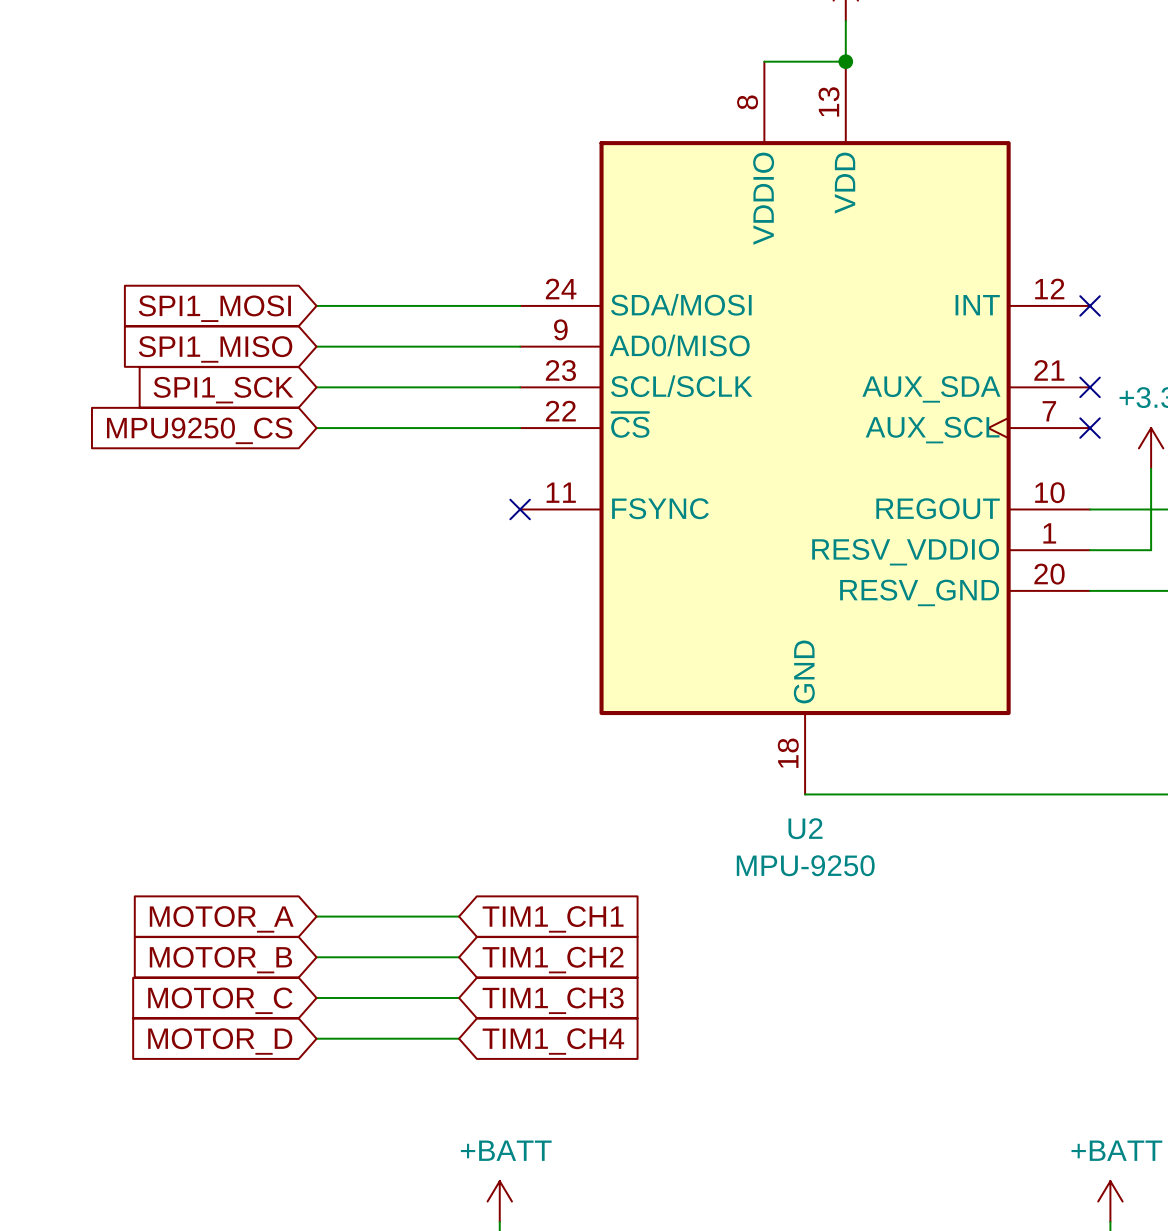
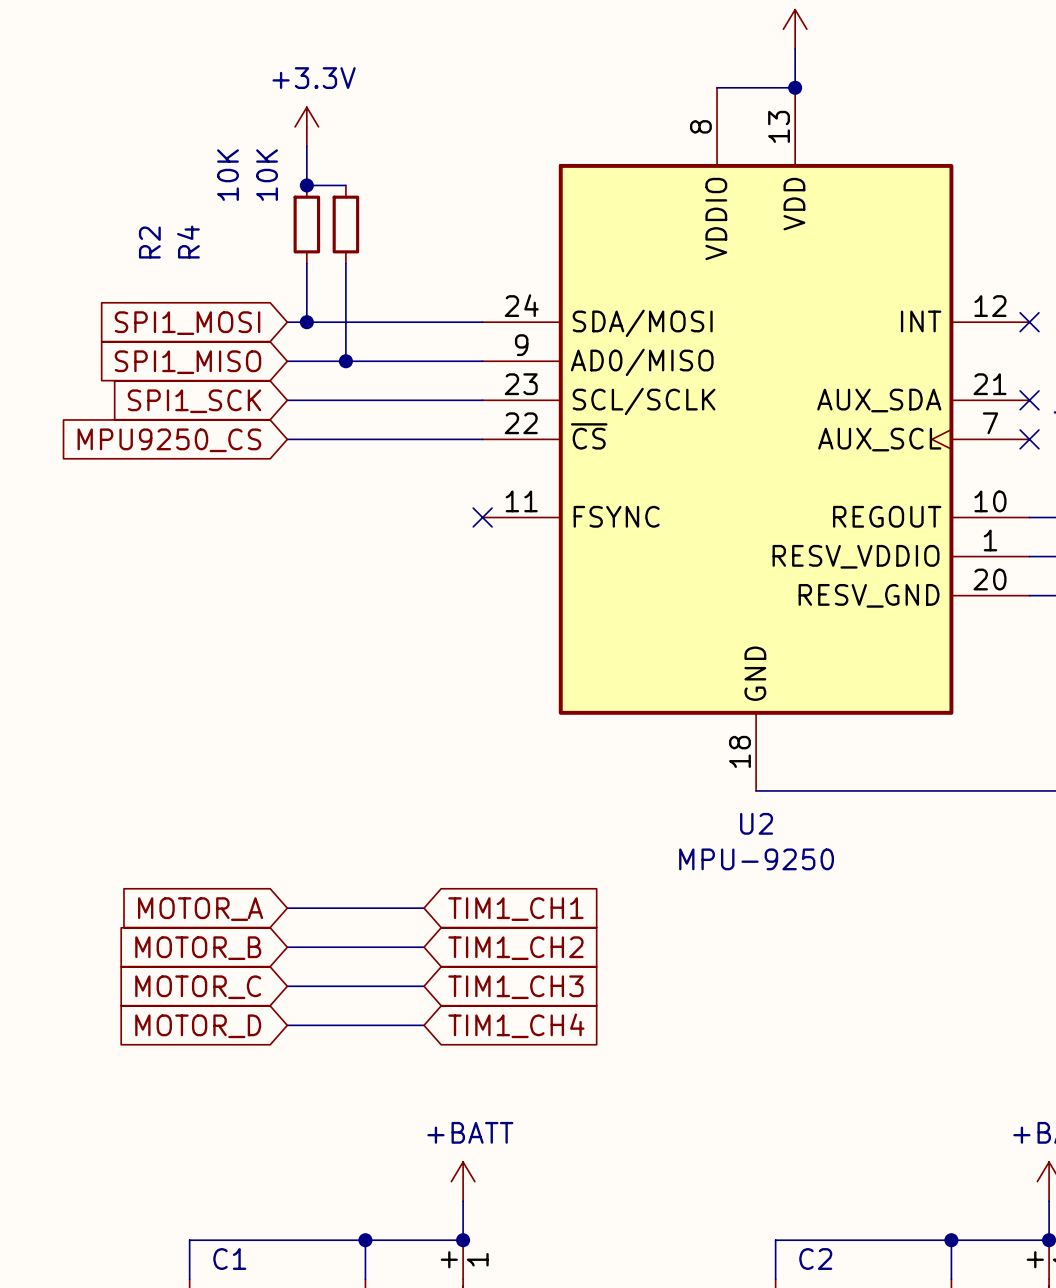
power symbol: none -> +3.3V (306, 126)
wire: none -> (306, 146) (306, 185) (345, 185)
junction: none -> (306, 185)
R2: none -> 10K (306, 224)
R4: none -> 10K (345, 224)
wire: none -> (306, 263) (306, 322)
wire: none -> (345, 263) (345, 361)
junction: none -> (306, 322)
junction: none -> (345, 361)

